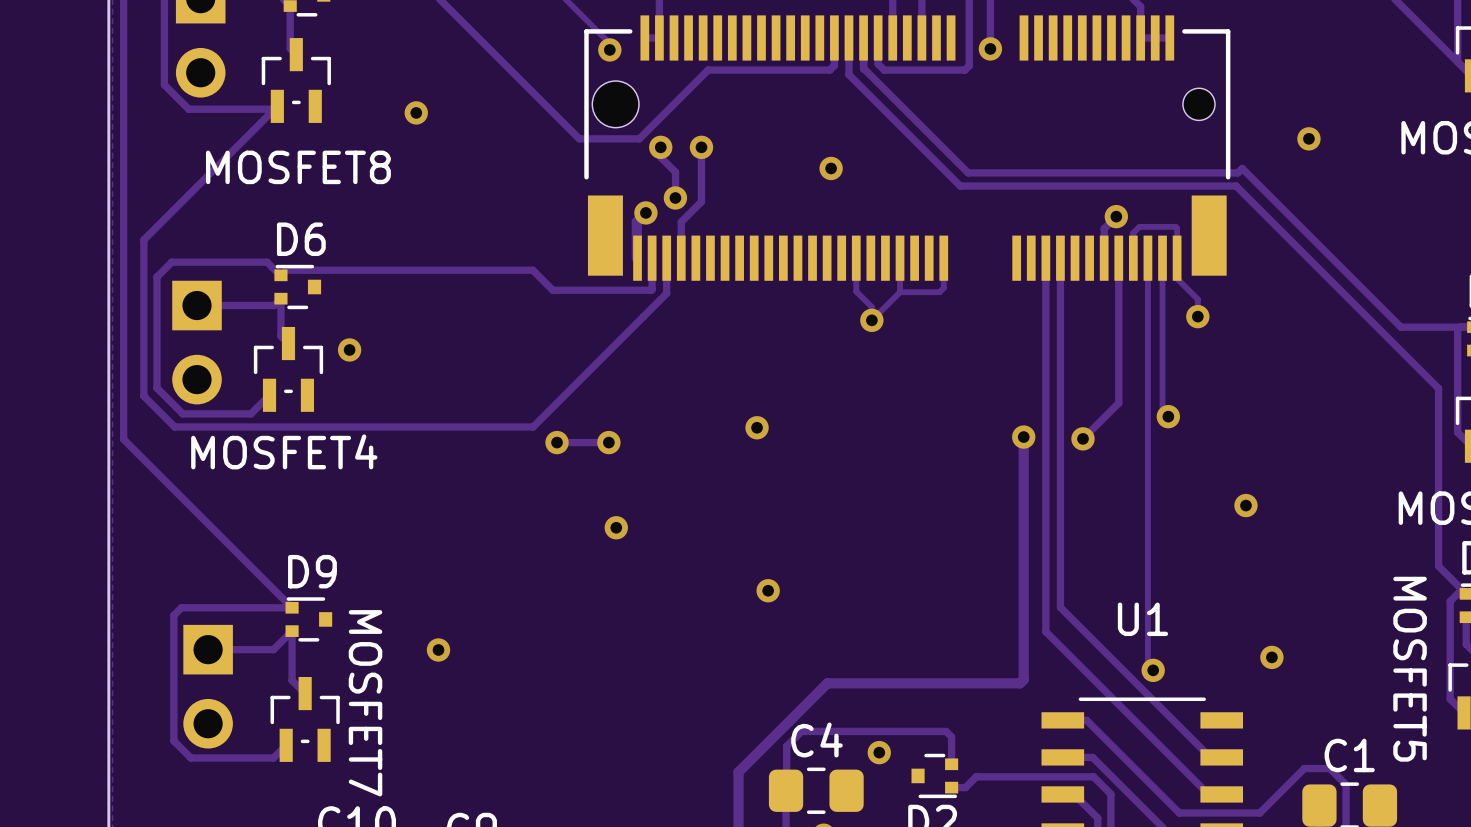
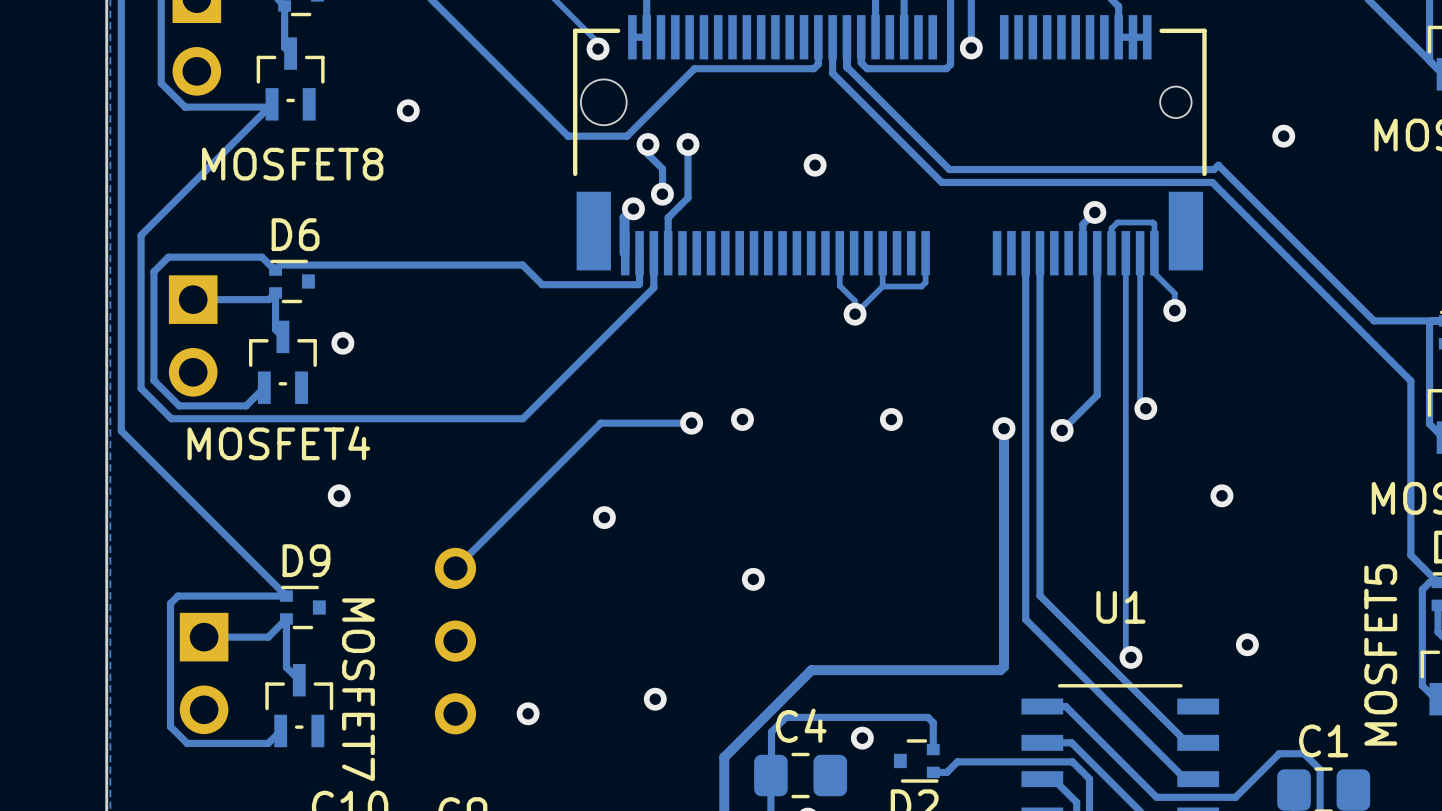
via: none -> (891, 419)
track: none -> (691, 423) (600, 423) (455, 568)
via: none -> (691, 423)
via: (557, 442) -> none
track: (608, 442) (557, 442) -> none
via: (608, 442) -> none
via: none -> (339, 495)
via: (438, 650) -> none
part: none -> (455, 641)
MOSFET5 name rotation: 0° (1410, 669) -> 180° (1380, 654)
via: none -> (655, 699)
via: none -> (528, 713)

